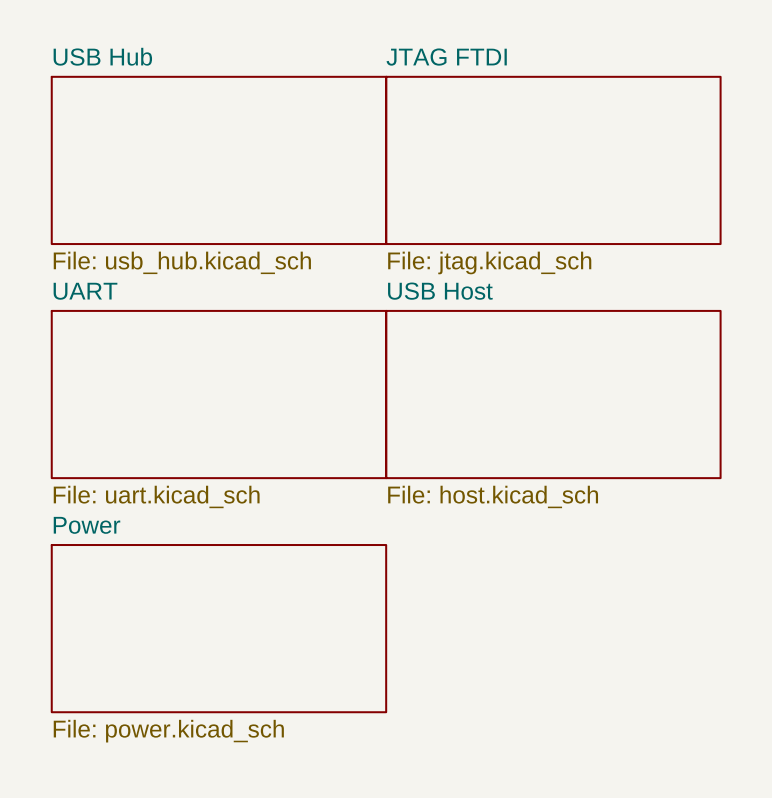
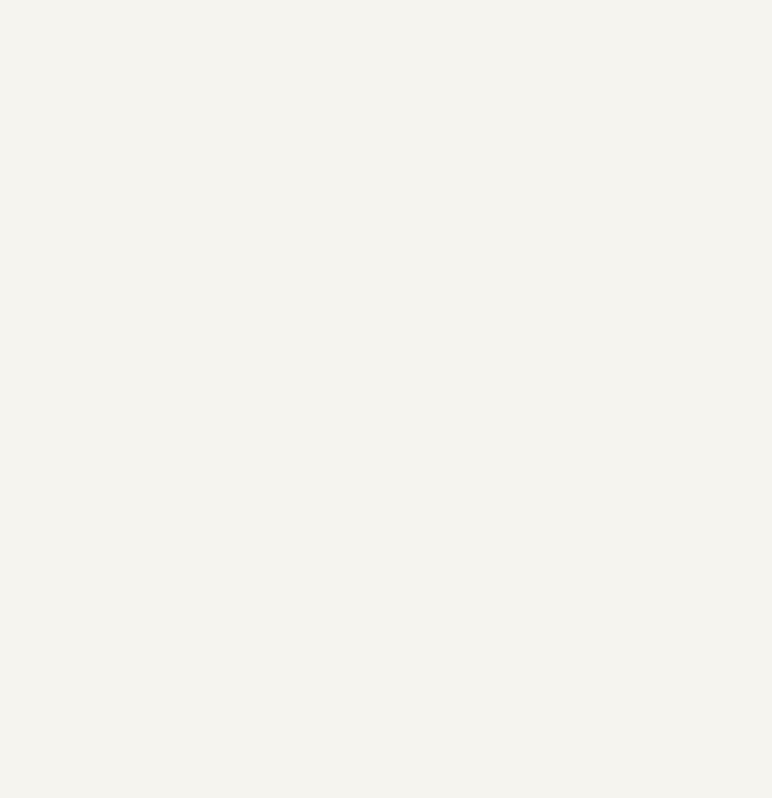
sheet USB Hub: File: usb_hub.kicad_sch (218, 160) -> none
sheet JTAG FTDI: File: jtag.kicad_sch (553, 160) -> none
sheet UART: File: uart.kicad_sch (218, 394) -> none
sheet USB Host: File: host.kicad_sch (553, 394) -> none
sheet Power: File: power.kicad_sch (218, 628) -> none

